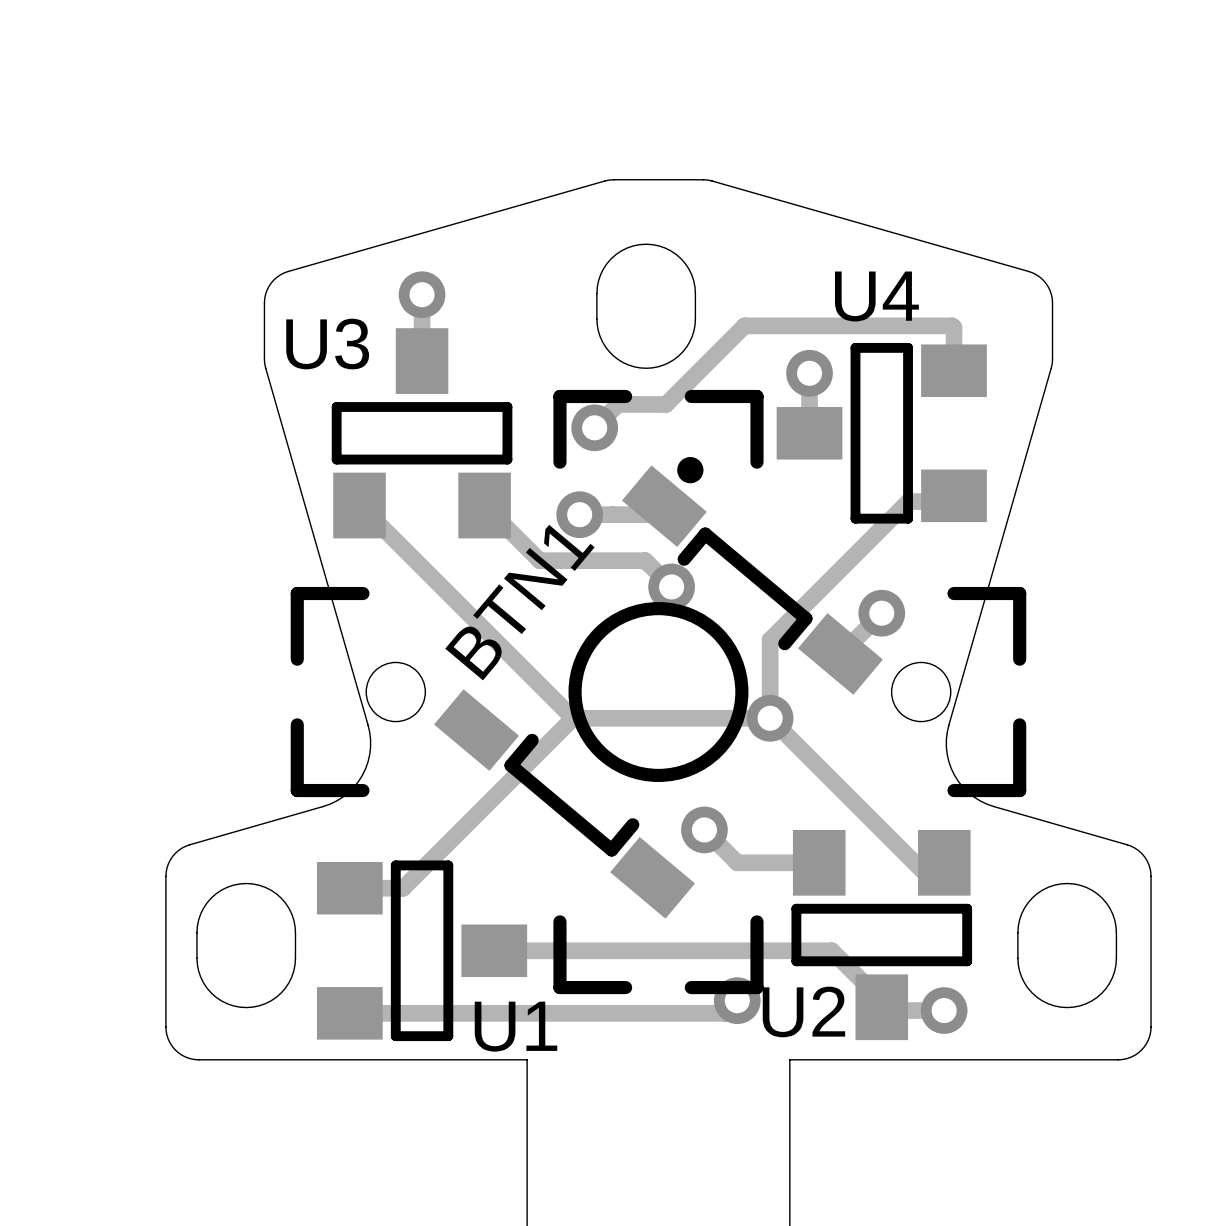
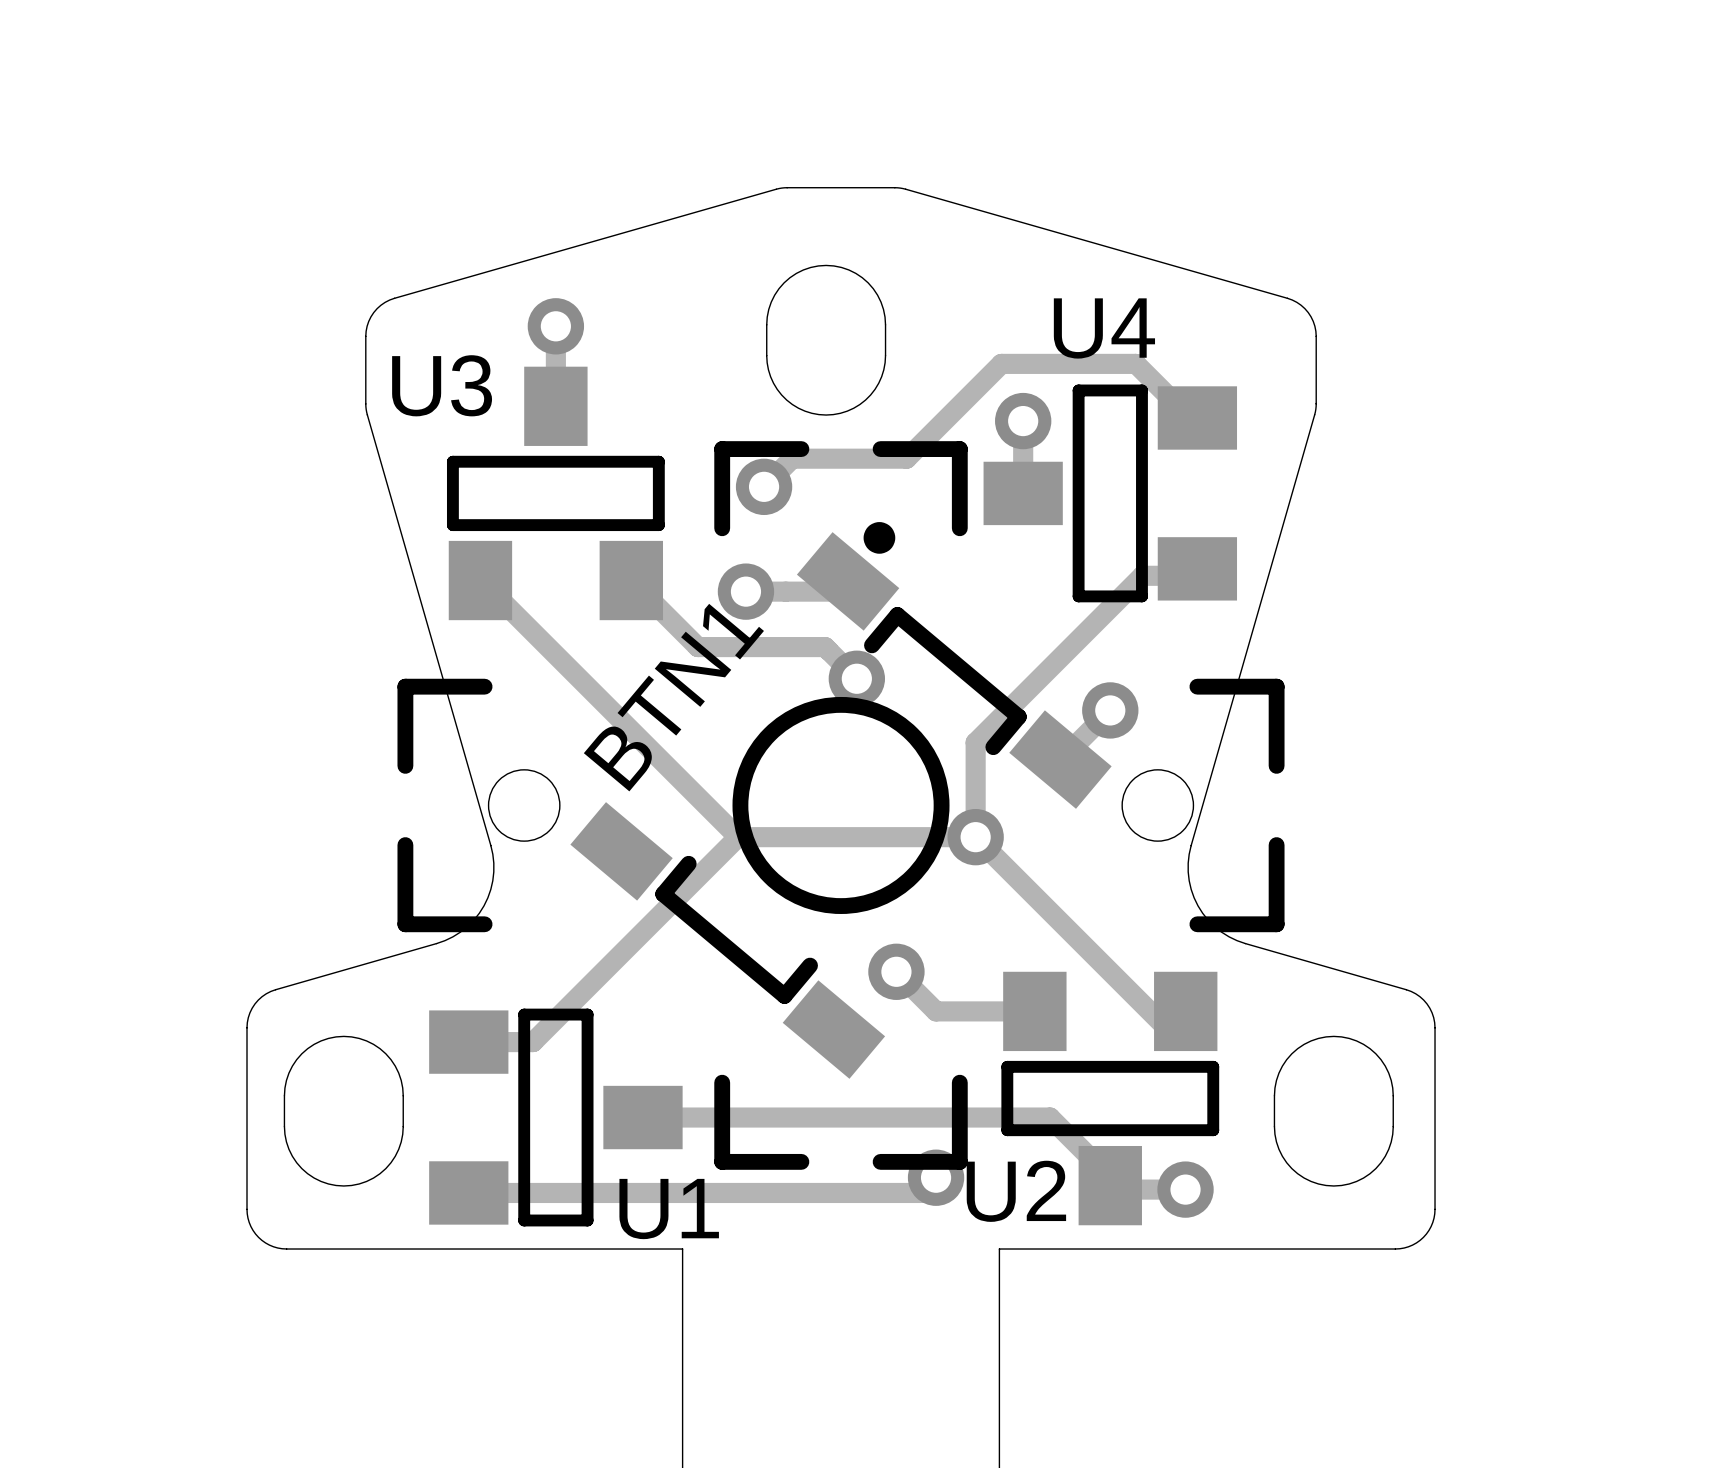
track: (791, 325) (744, 325) (666, 404) -> (1001, 363) (906, 458) (850, 458)
track: (903, 325) (952, 325) (954, 327) (954, 370) -> (1135, 363) (1165, 393)

